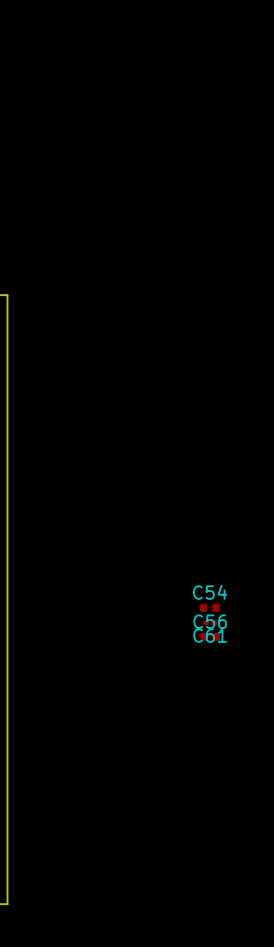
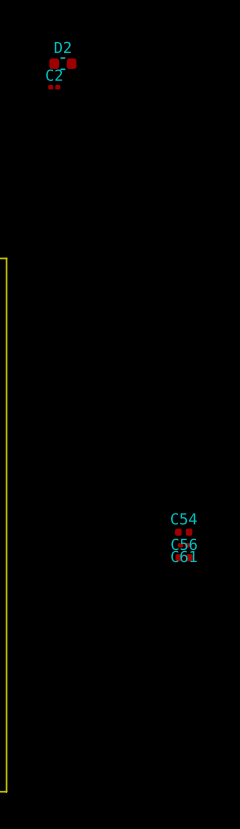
D2: none -> (62, 63)
C2: none -> (54, 87)

